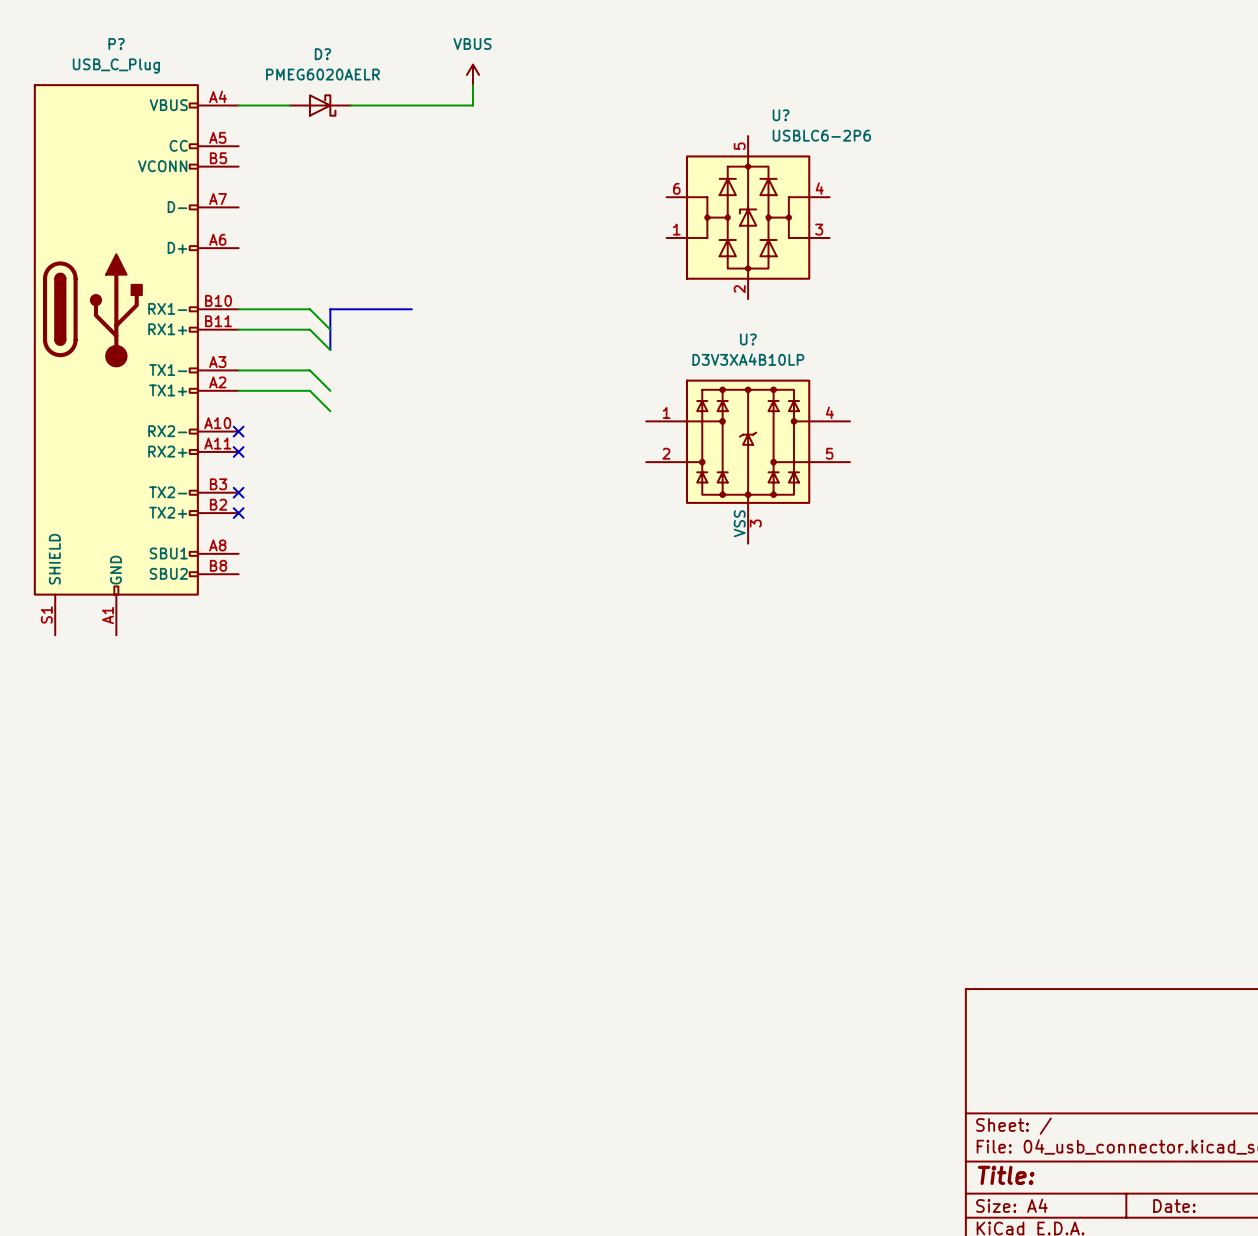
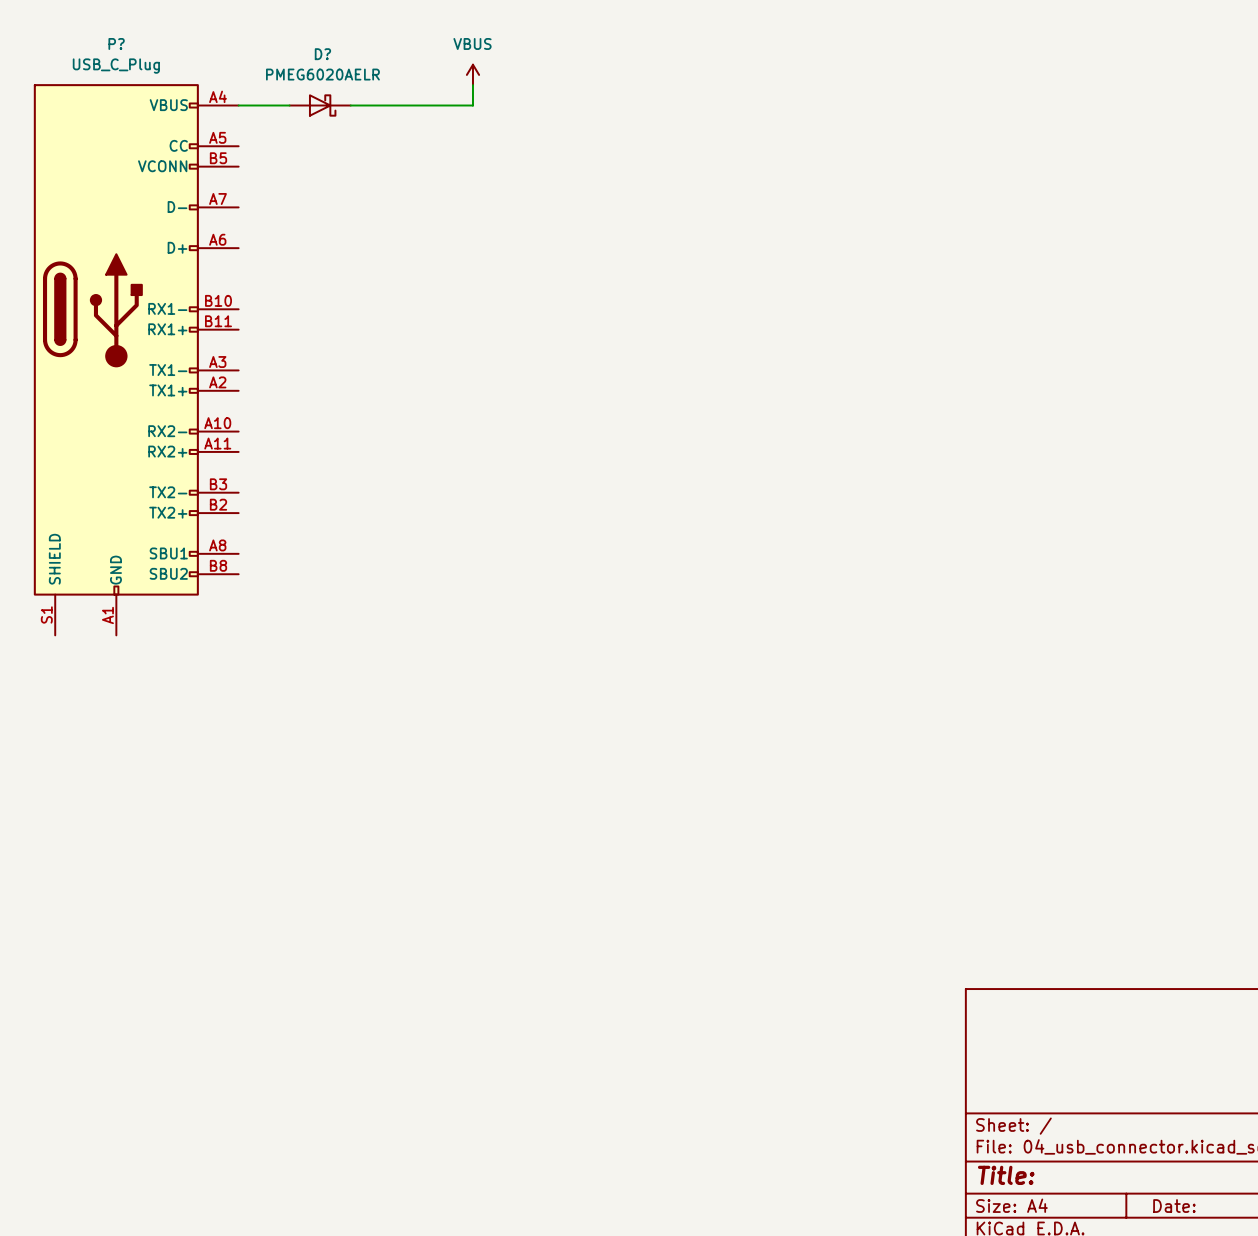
U?: USBLC6-2P6 (748, 217) -> none
wire: (238, 309) (309, 309) (330, 329) -> none
bus: (411, 309) (330, 309) (330, 350) -> none
wire: (238, 329) (309, 329) (330, 350) -> none
wire: (238, 370) (309, 370) (330, 390) -> none
wire: (238, 390) (309, 390) (330, 411) -> none
no-connect mark: (238, 431) -> none
no-connect mark: (238, 451) -> none
U?: D3V3XA4B10LP (748, 461) -> none
no-connect mark: (238, 492) -> none
no-connect mark: (238, 513) -> none

